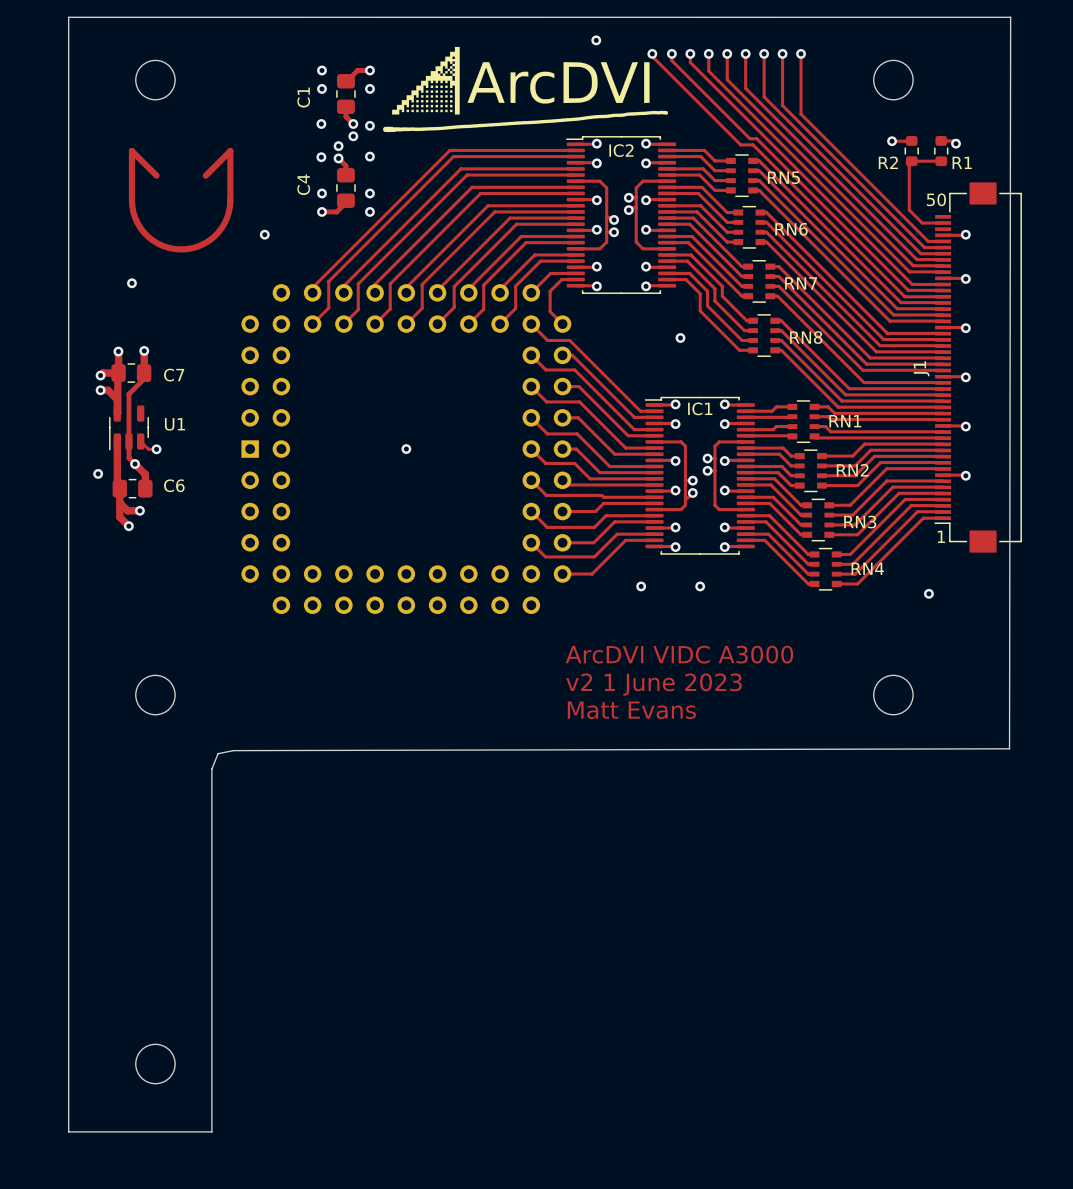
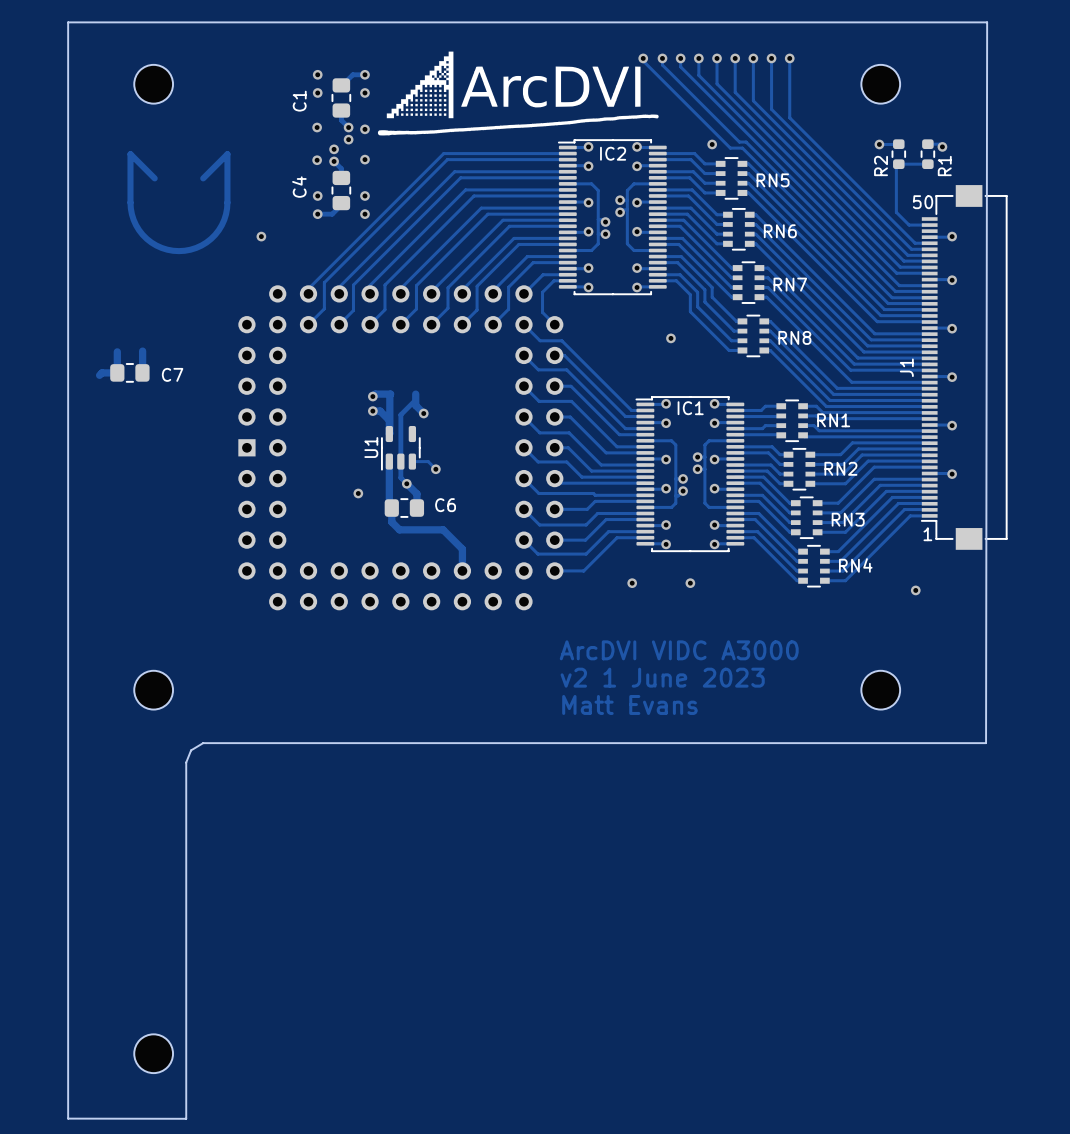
board edge: (1001, 17) (1010, 17) (1009, 748) (233, 750) (218, 753) (211, 769) (211, 1131) (68, 1131) (68, 1129) -> (987, 22) (986, 743) (203, 743) (191, 750) (186, 762) (186, 1118) (68, 1118)
via: (596, 40) -> none
via: none -> (712, 144)
R2 name rotation: 0° (888, 162) -> 90° counterclockwise (881, 166)
R1 name rotation: 0° (962, 162) -> 90° counterclockwise (944, 166)
via: (131, 283) -> none
via: (144, 350) -> none
via: (118, 351) -> none
track: (118, 373) (117, 413) (117, 399) (107, 390) (100, 390) -> none
track: (144, 373) (144, 378) (129, 394) (129, 458) (145, 474) (145, 488) -> none
via: (100, 375) -> none
via: (100, 390) -> none
track: none -> (372, 396) (375, 394) (390, 394) (389, 434) (389, 420) (380, 411) (372, 411)
via: none -> (372, 396)
via: none -> (372, 411)
track: none -> (423, 413) (415, 405) (415, 394) (415, 399) (400, 414) (400, 477) (416, 493) (416, 508)
via: none -> (423, 413)
U1 name rotation: 0° (174, 424) -> 90° counterclockwise (371, 447)
U1 name position: U1 (174, 424) -> U1 (371, 447)
U1 position: (129, 427) -> (400, 448)
track: (117, 441) (119, 517) (128, 526) -> none
track: (140, 441) (148, 449) (156, 449) -> none
via: (156, 449) -> none
via: (406, 449) -> none
track: none -> (389, 461) (389, 505) (391, 508) (391, 522) (399, 529) (443, 529) (462, 549) (462, 570)
track: none -> (412, 461) (428, 461) (435, 469)
via: (135, 464) -> none
via: none -> (435, 469)
via: (98, 473) -> none
via: none -> (406, 483)
C6 position: (132, 488) -> (404, 508)
via: none -> (358, 493)
track: (119, 502) (127, 510) (139, 510) -> none
via: (139, 510) -> none
via: (128, 526) -> none

